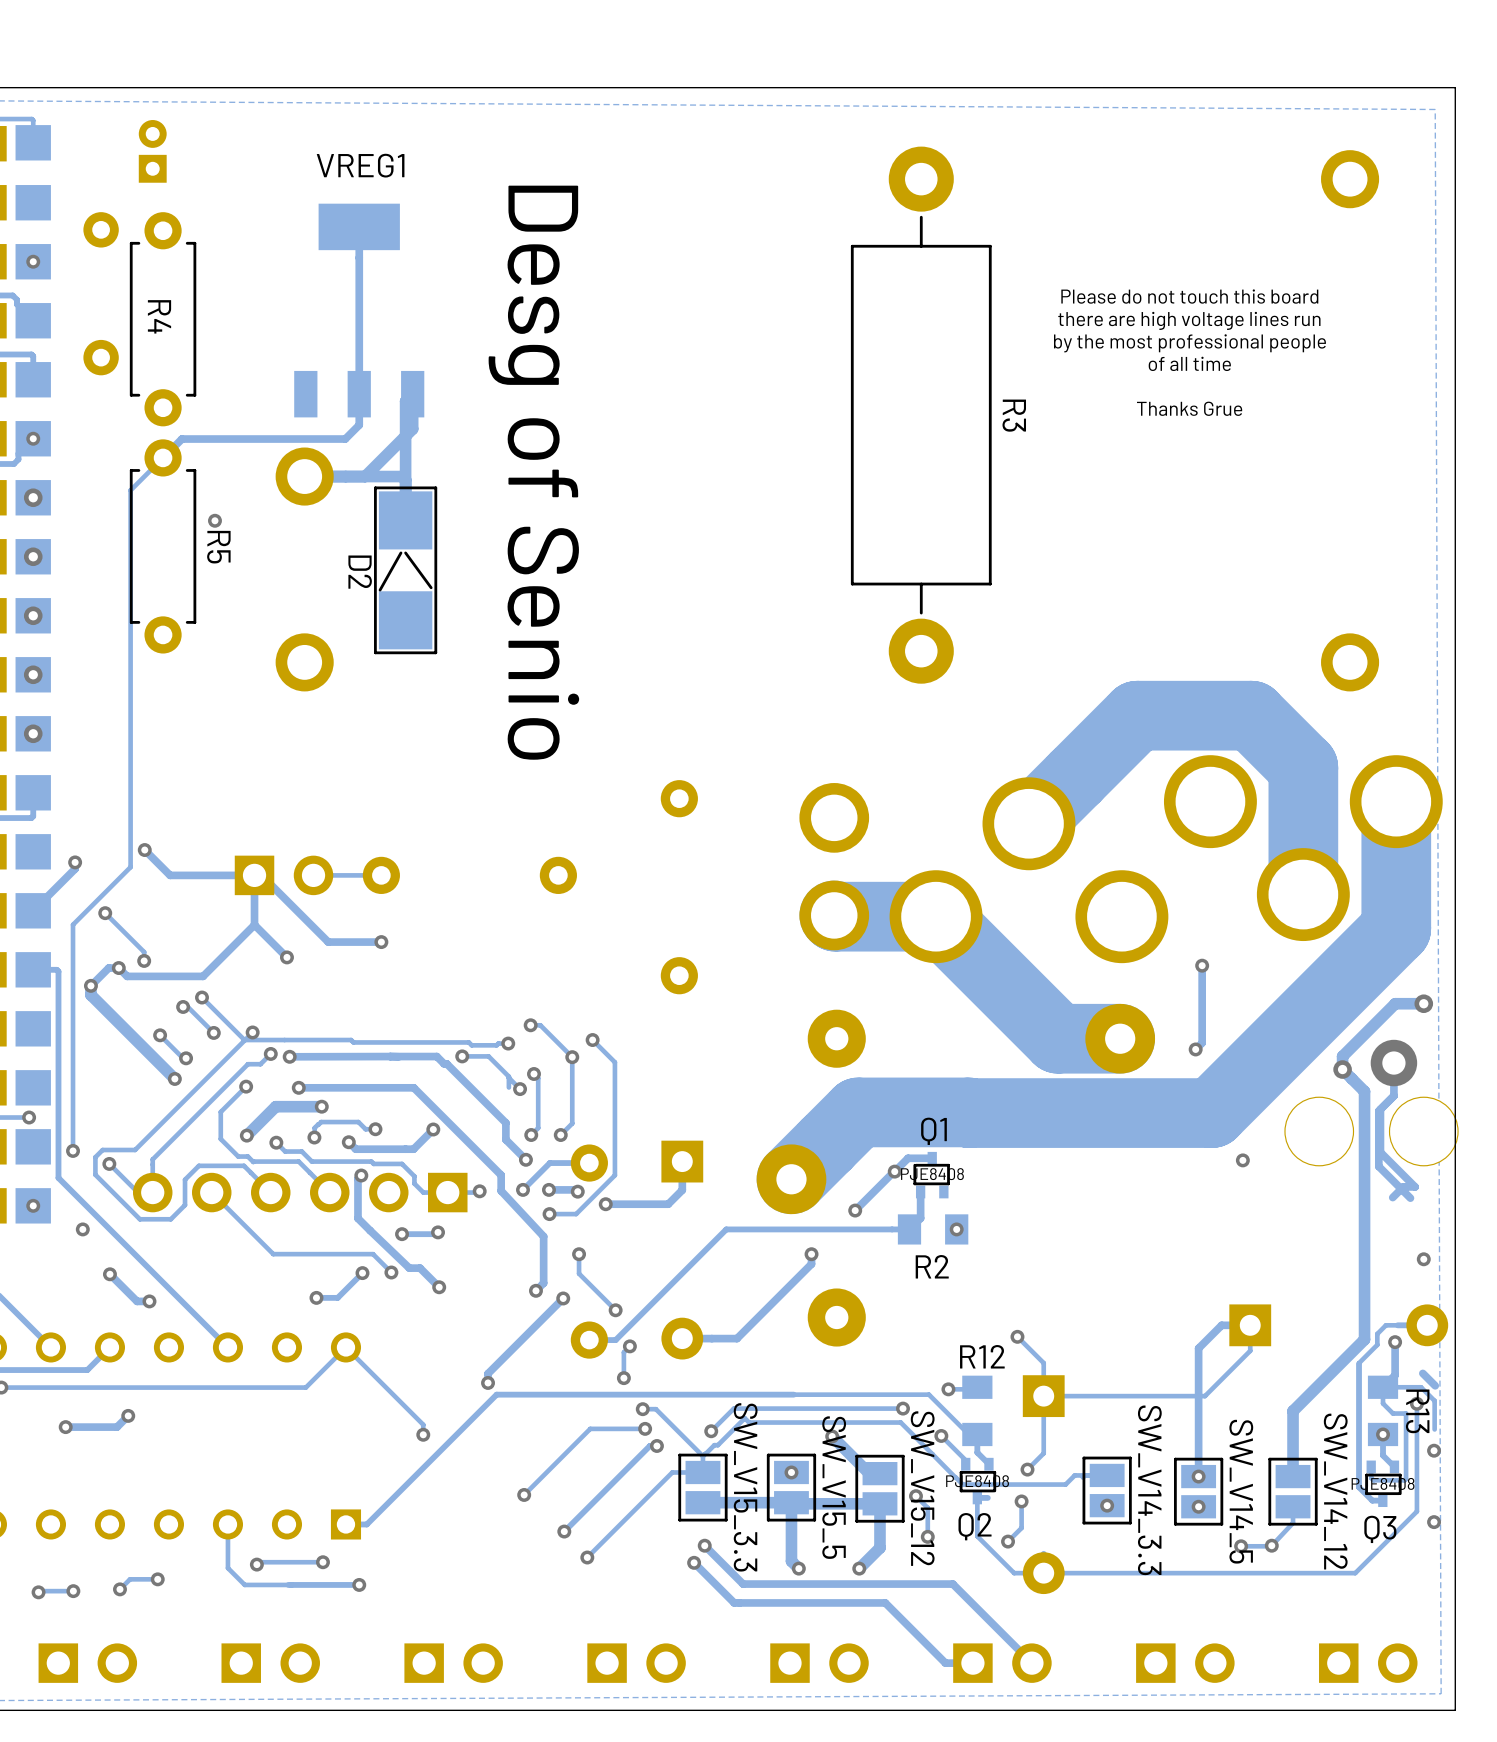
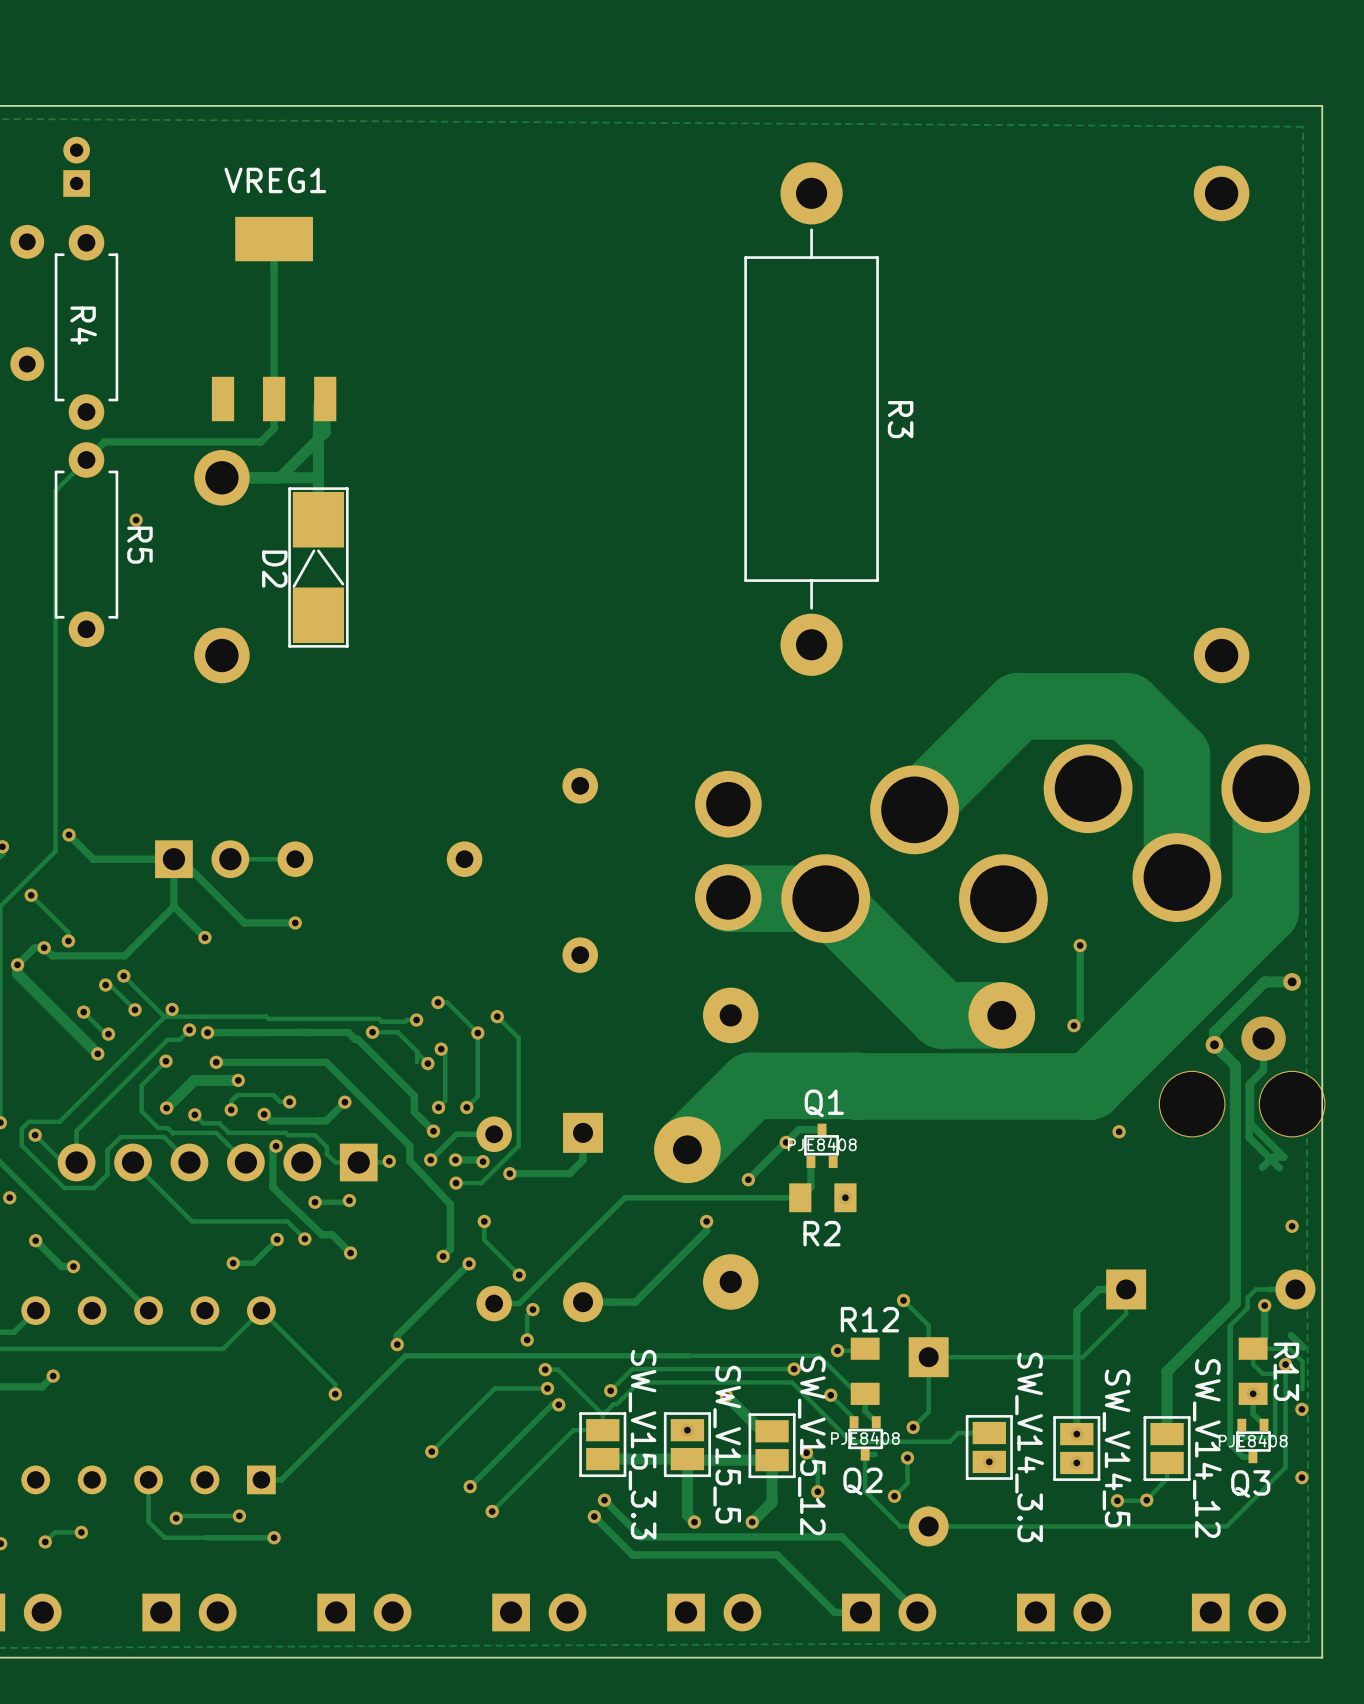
text: Please do not touch this board (1189, 296) -> none
text: there are high voltage lines run (1189, 320) -> none
text: by the most professional people (1189, 343) -> none
text: of all time (1189, 363) -> none
text: Thanks Grue (1189, 408) -> none
text: Desg of Senio (533, 472) -> none

